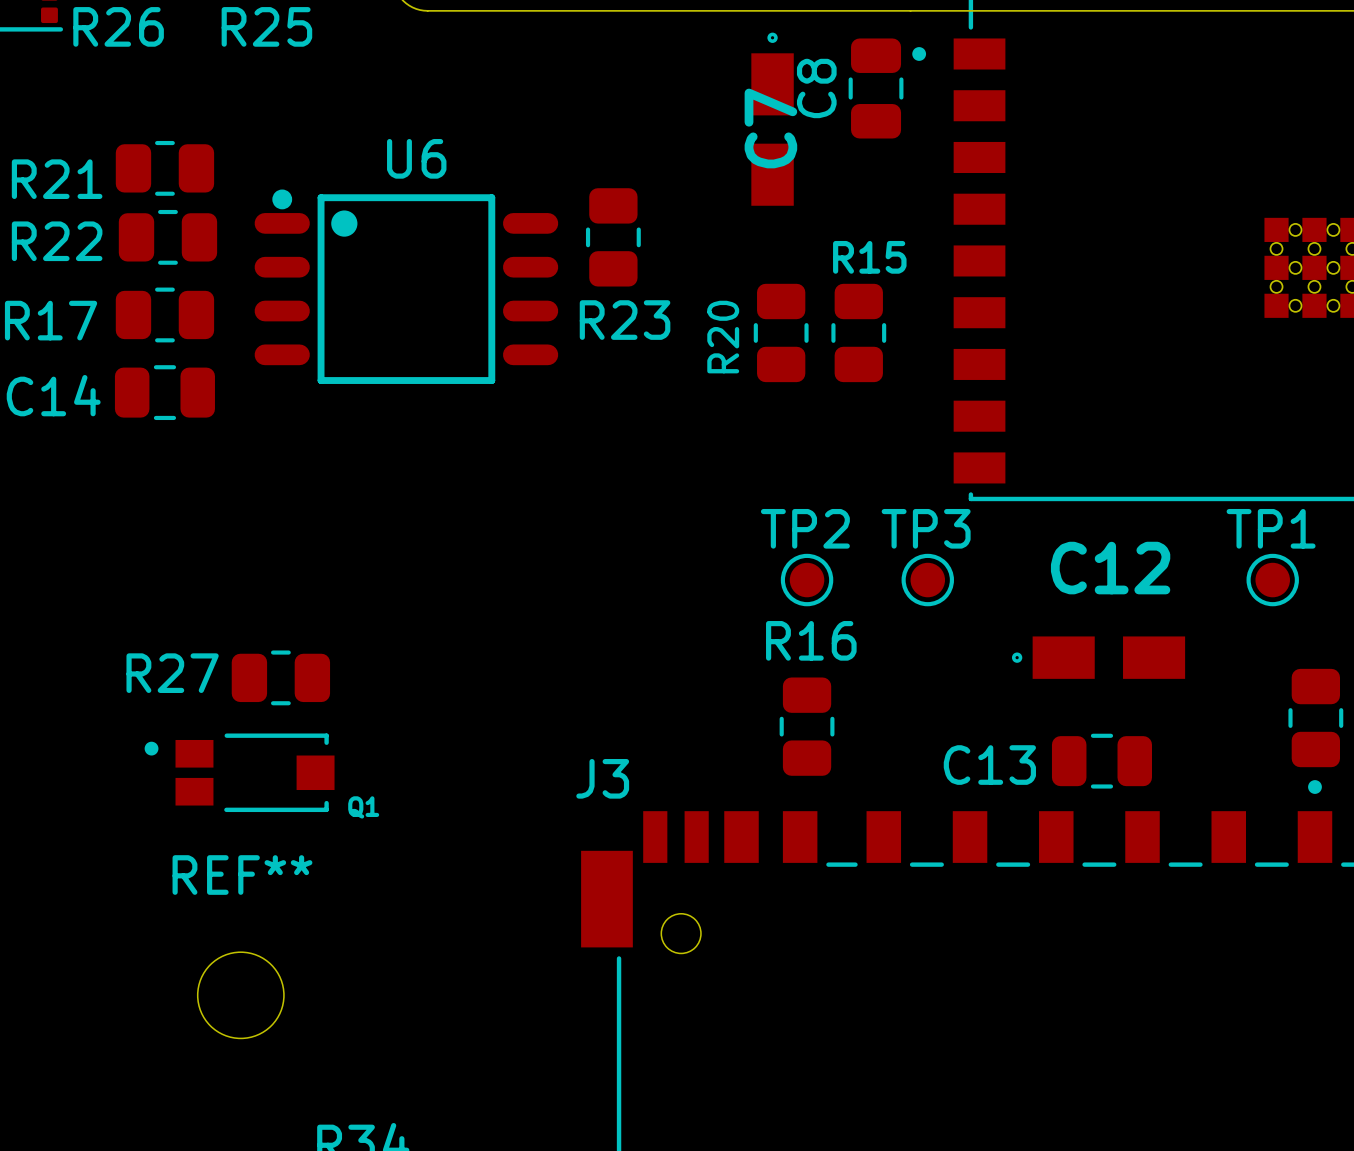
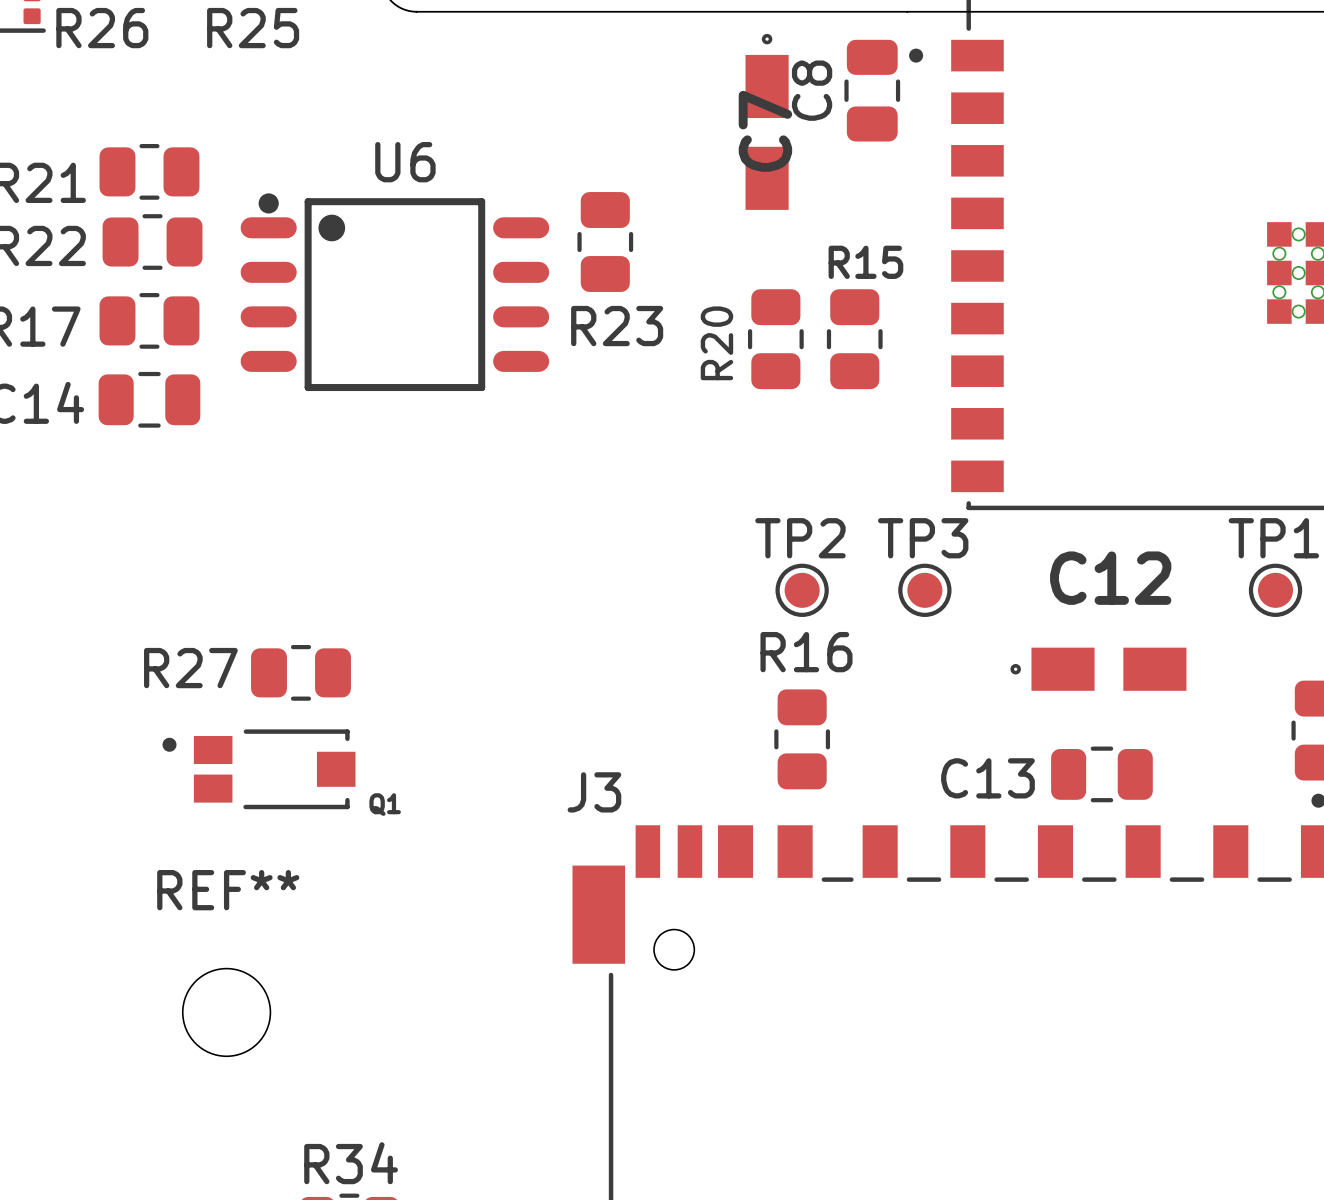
R27 position: (280, 677) -> (300, 672)
Q1 position: (239, 772) -> (259, 769)

